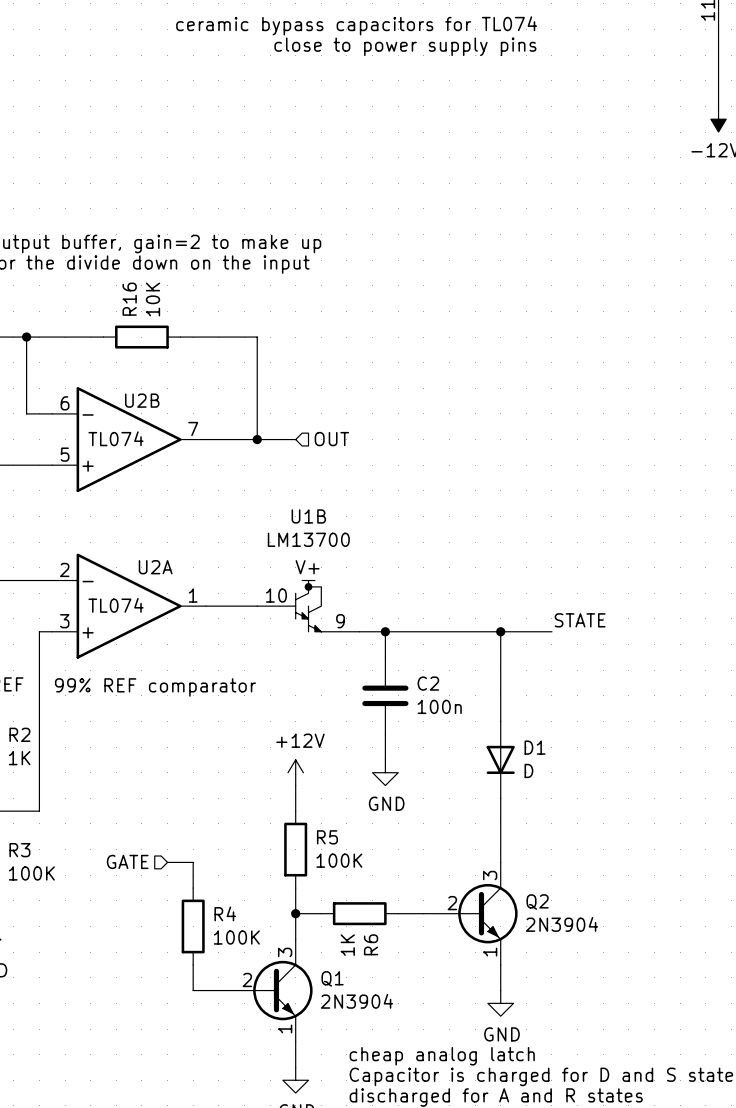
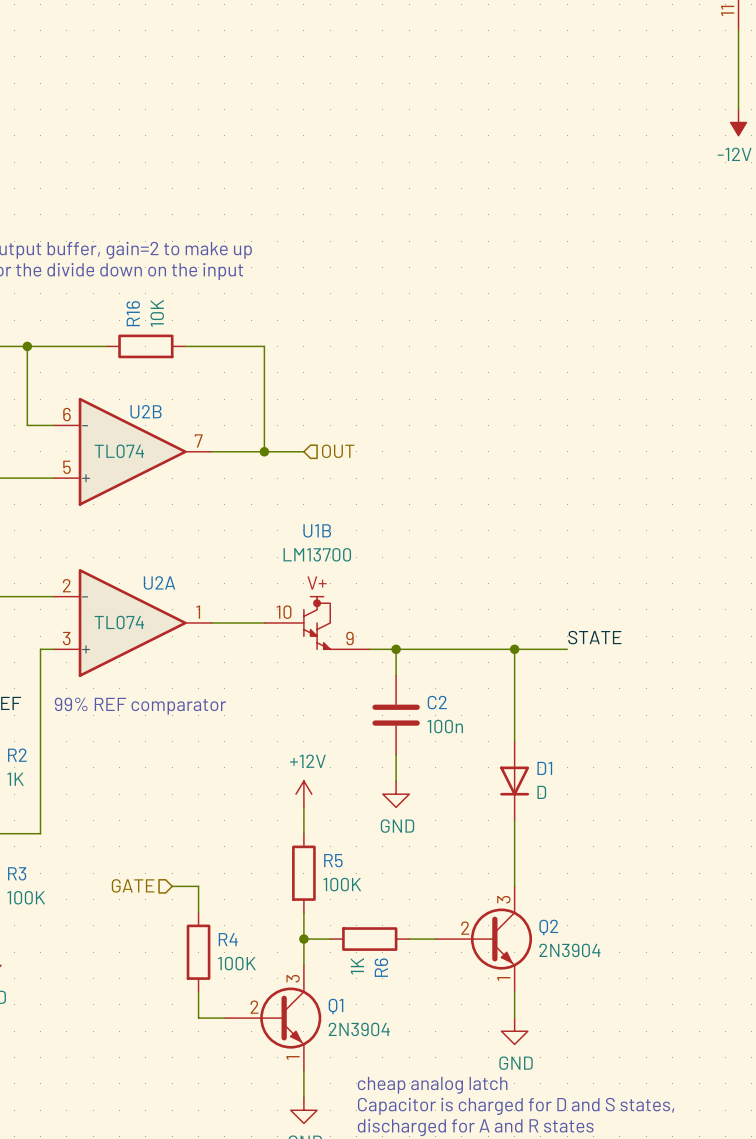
text: ceramic bypass capacitors for TL074 (356, 25) -> none
text: close to power supply pins (405, 46) -> none

